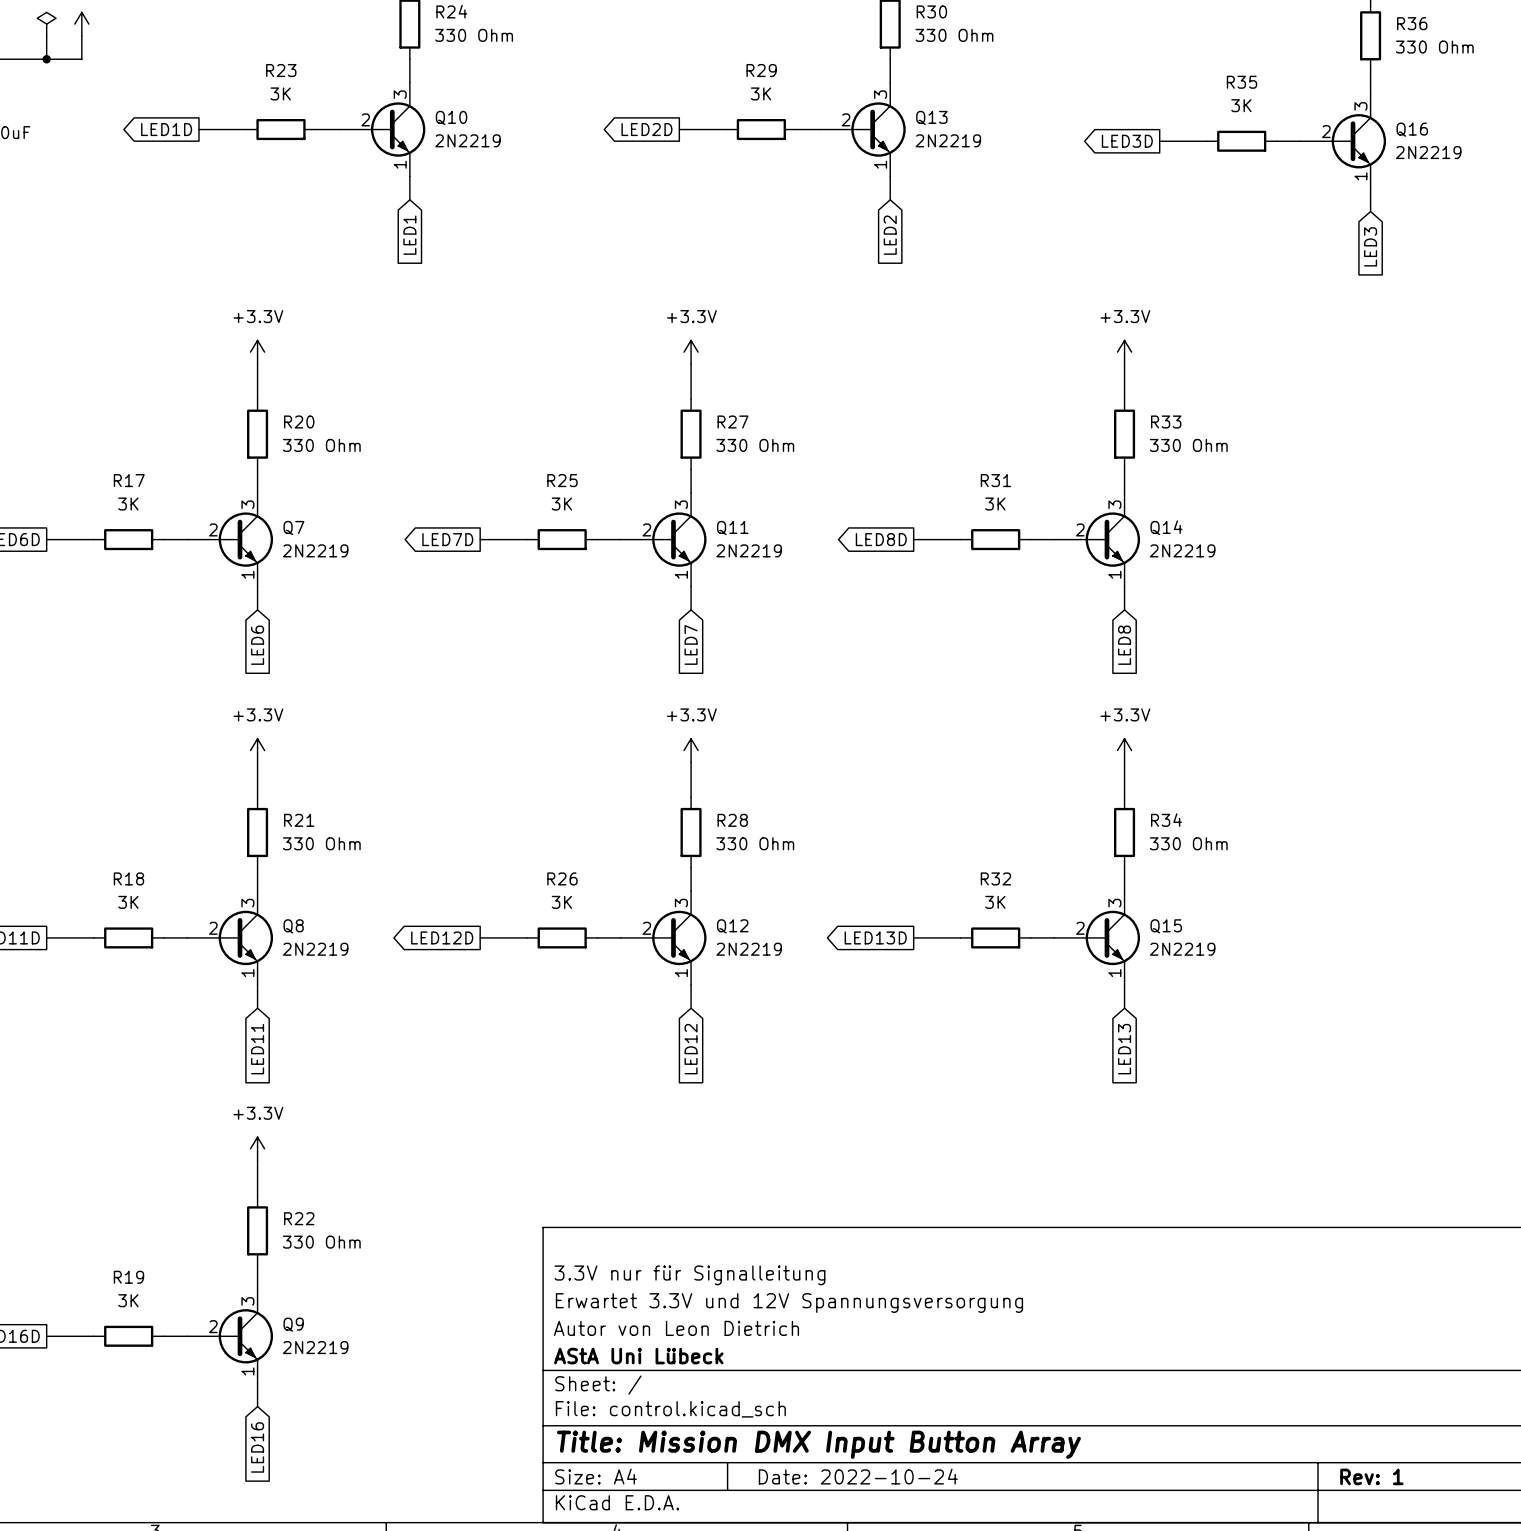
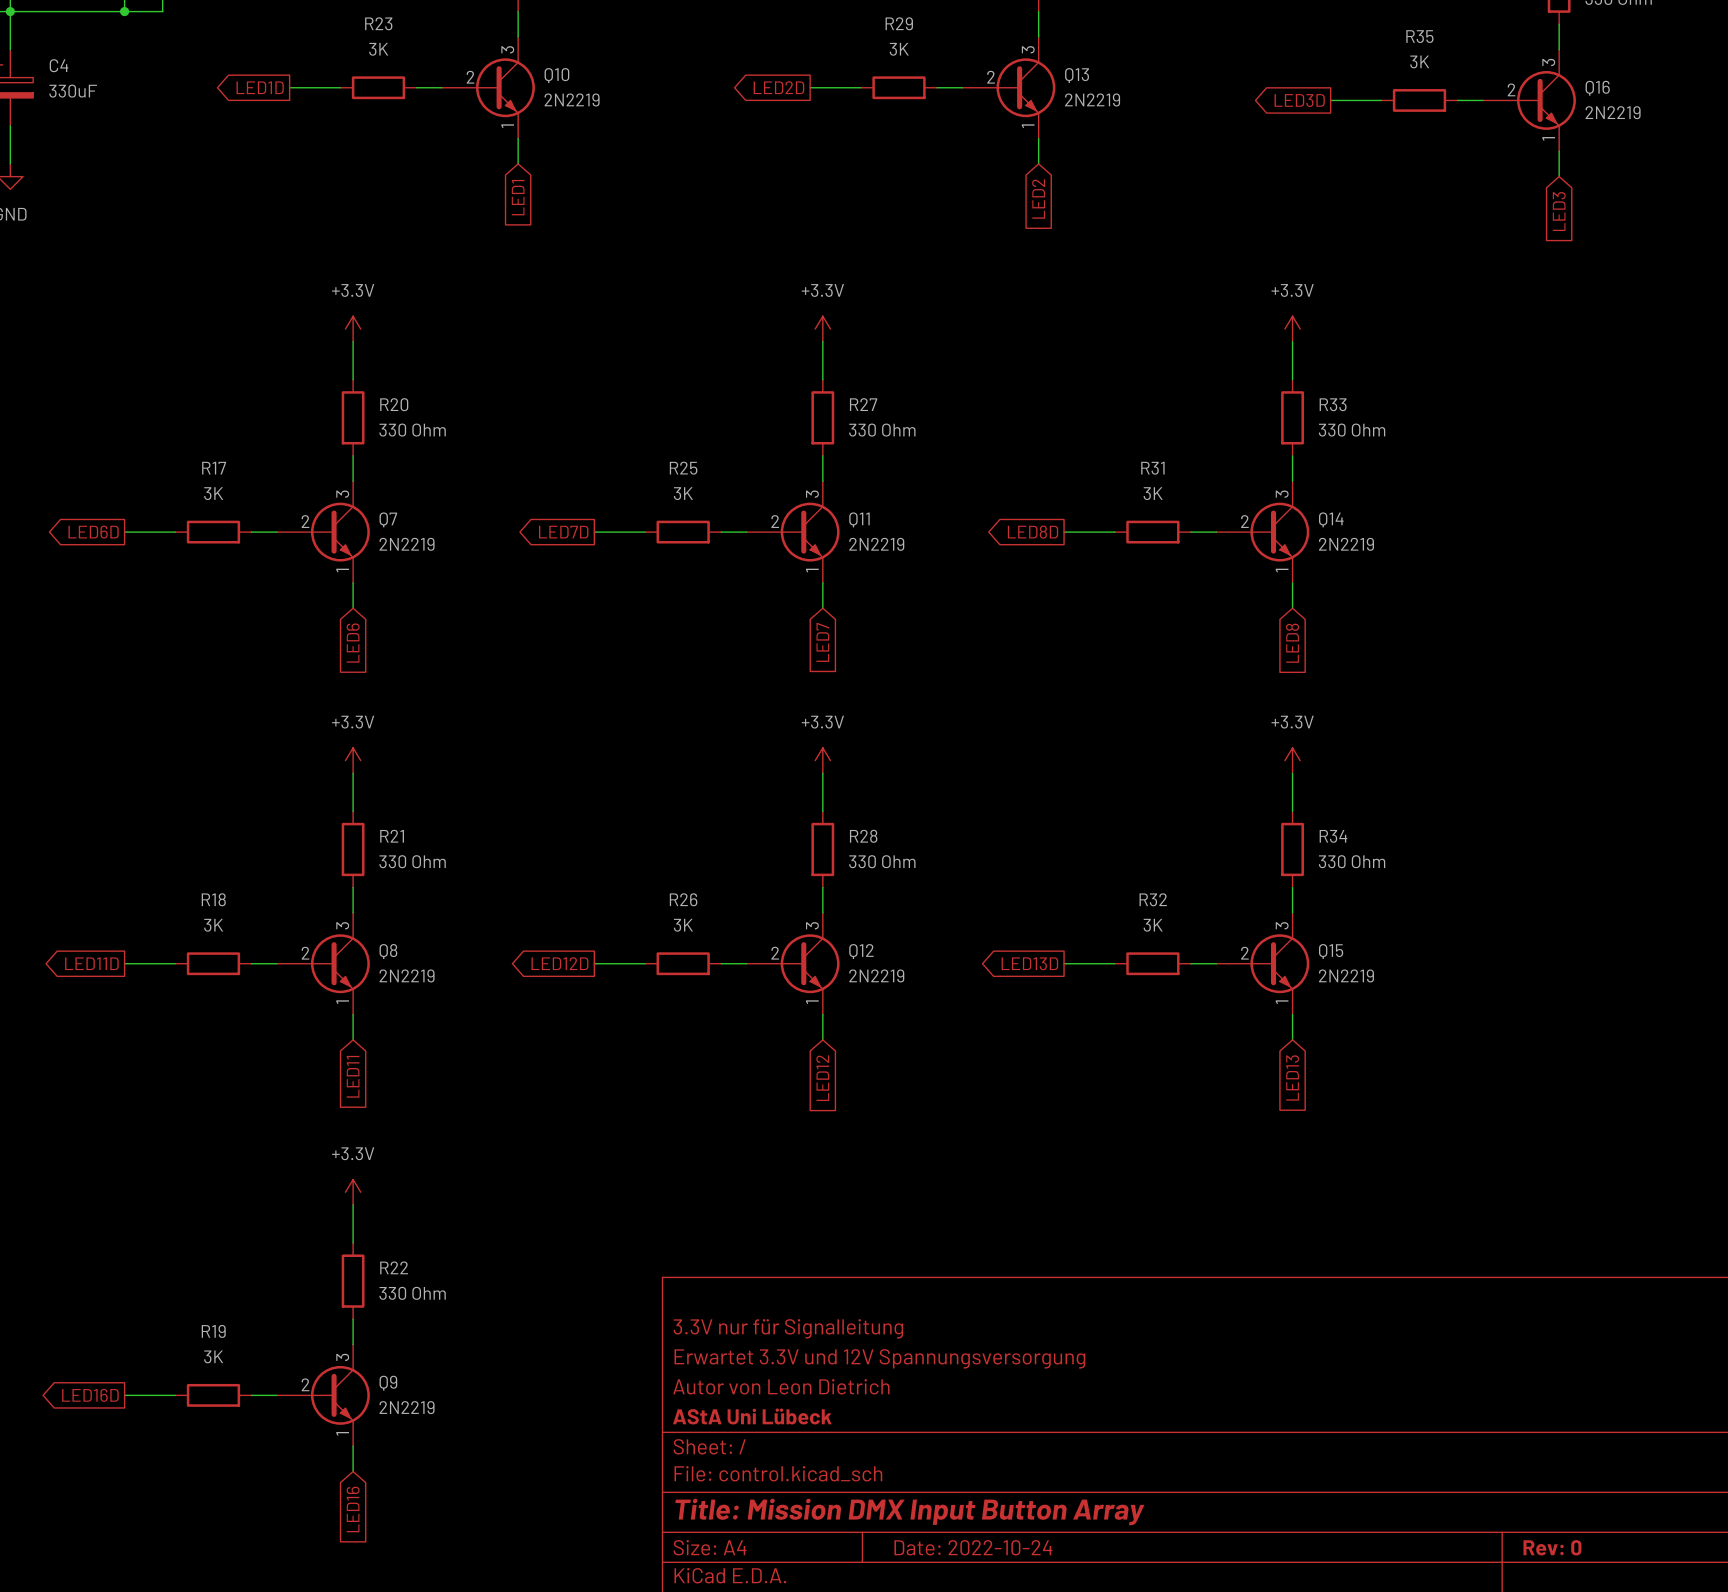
title block: Rev: 1 (1371, 1476) -> Rev: 0 (1552, 1547)

